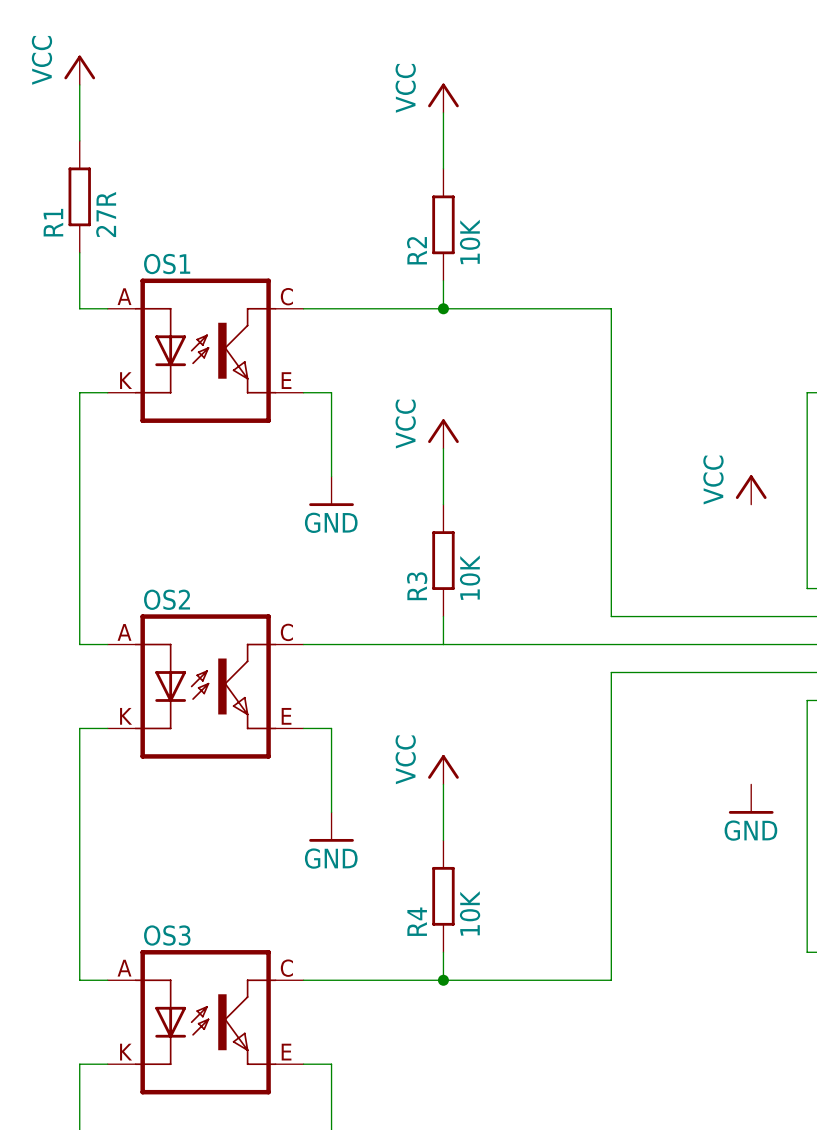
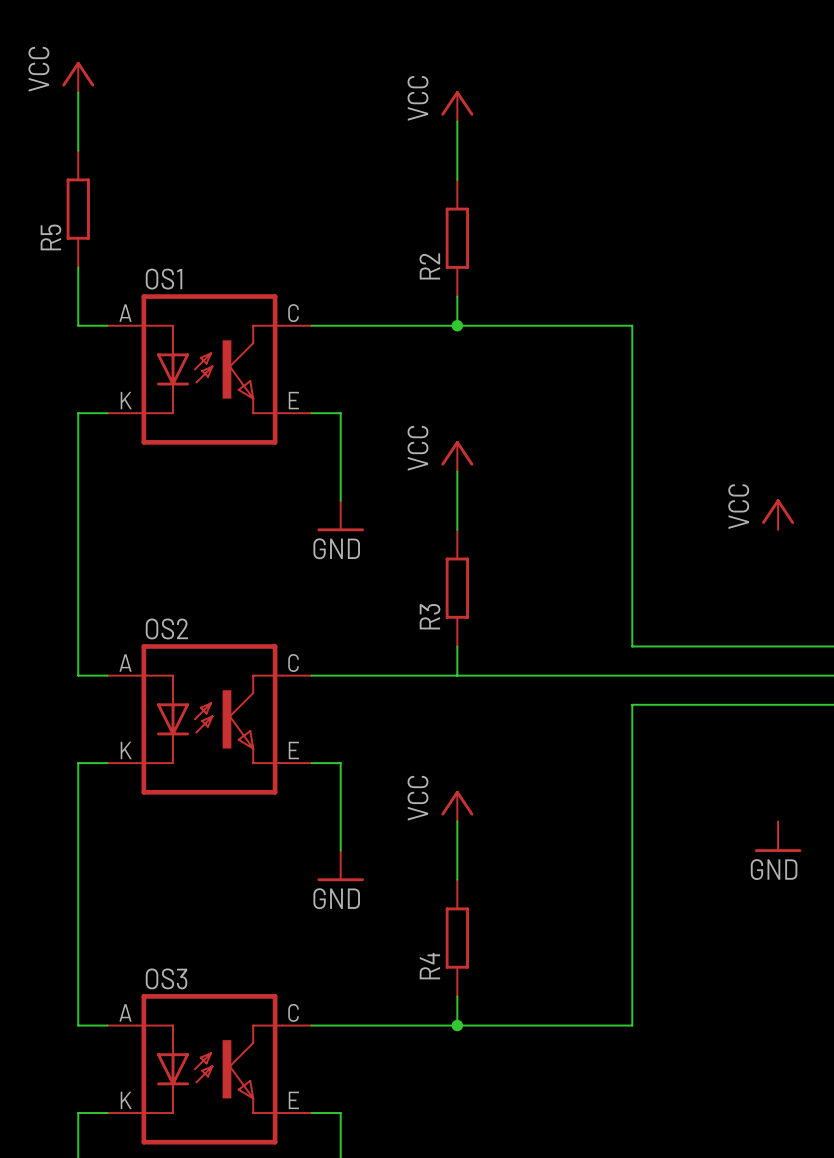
R1 value: 27R (106, 214) -> none
R1 name: R1 (53, 222) -> R5 (50, 237)
R2 value: 10K (470, 241) -> none
R3 value: 10K (470, 577) -> none
R4 value: 10K (470, 913) -> none

